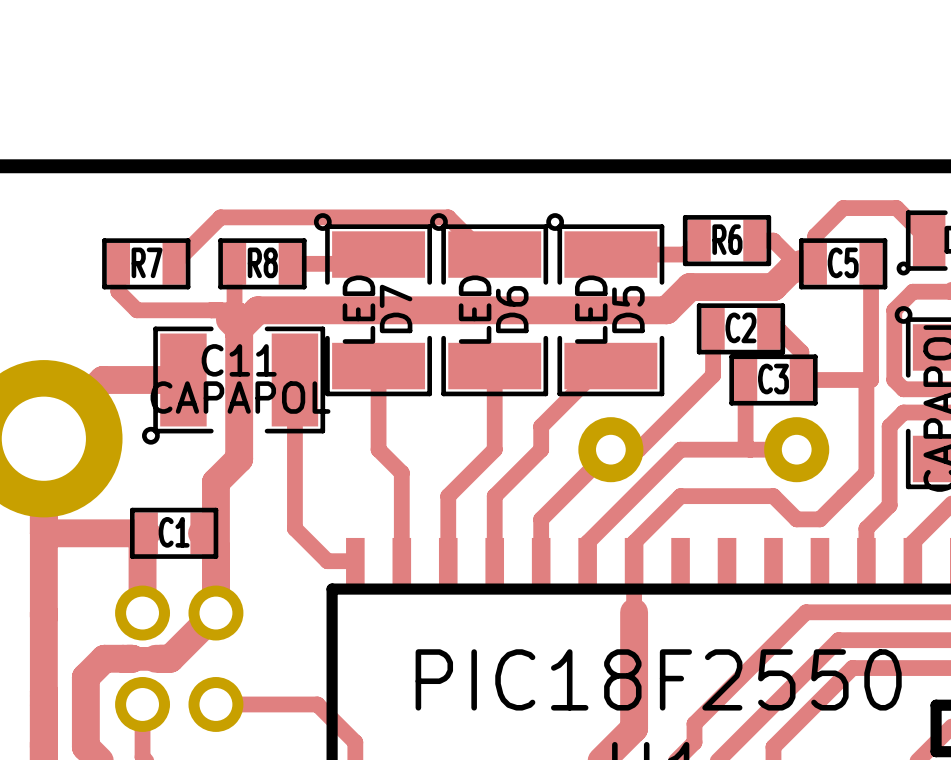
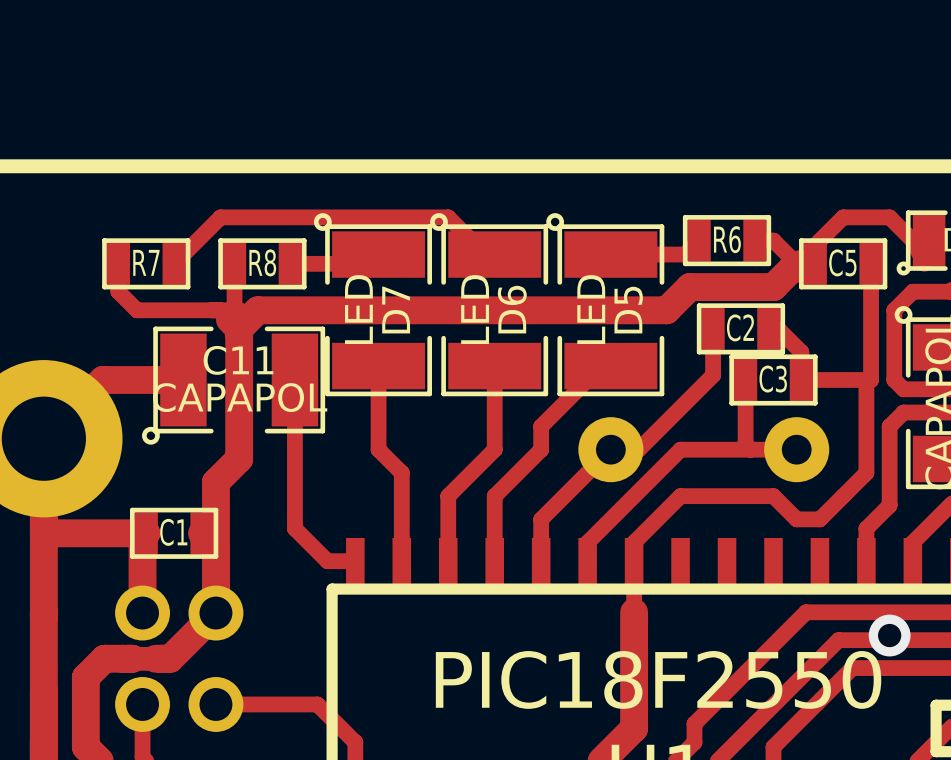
track: (929, 240) (896, 208) (843, 208) (815, 235) (815, 245) -> (924, 263) (912, 240) (889, 217) (843, 217) (815, 245)
via: none -> (889, 635)

